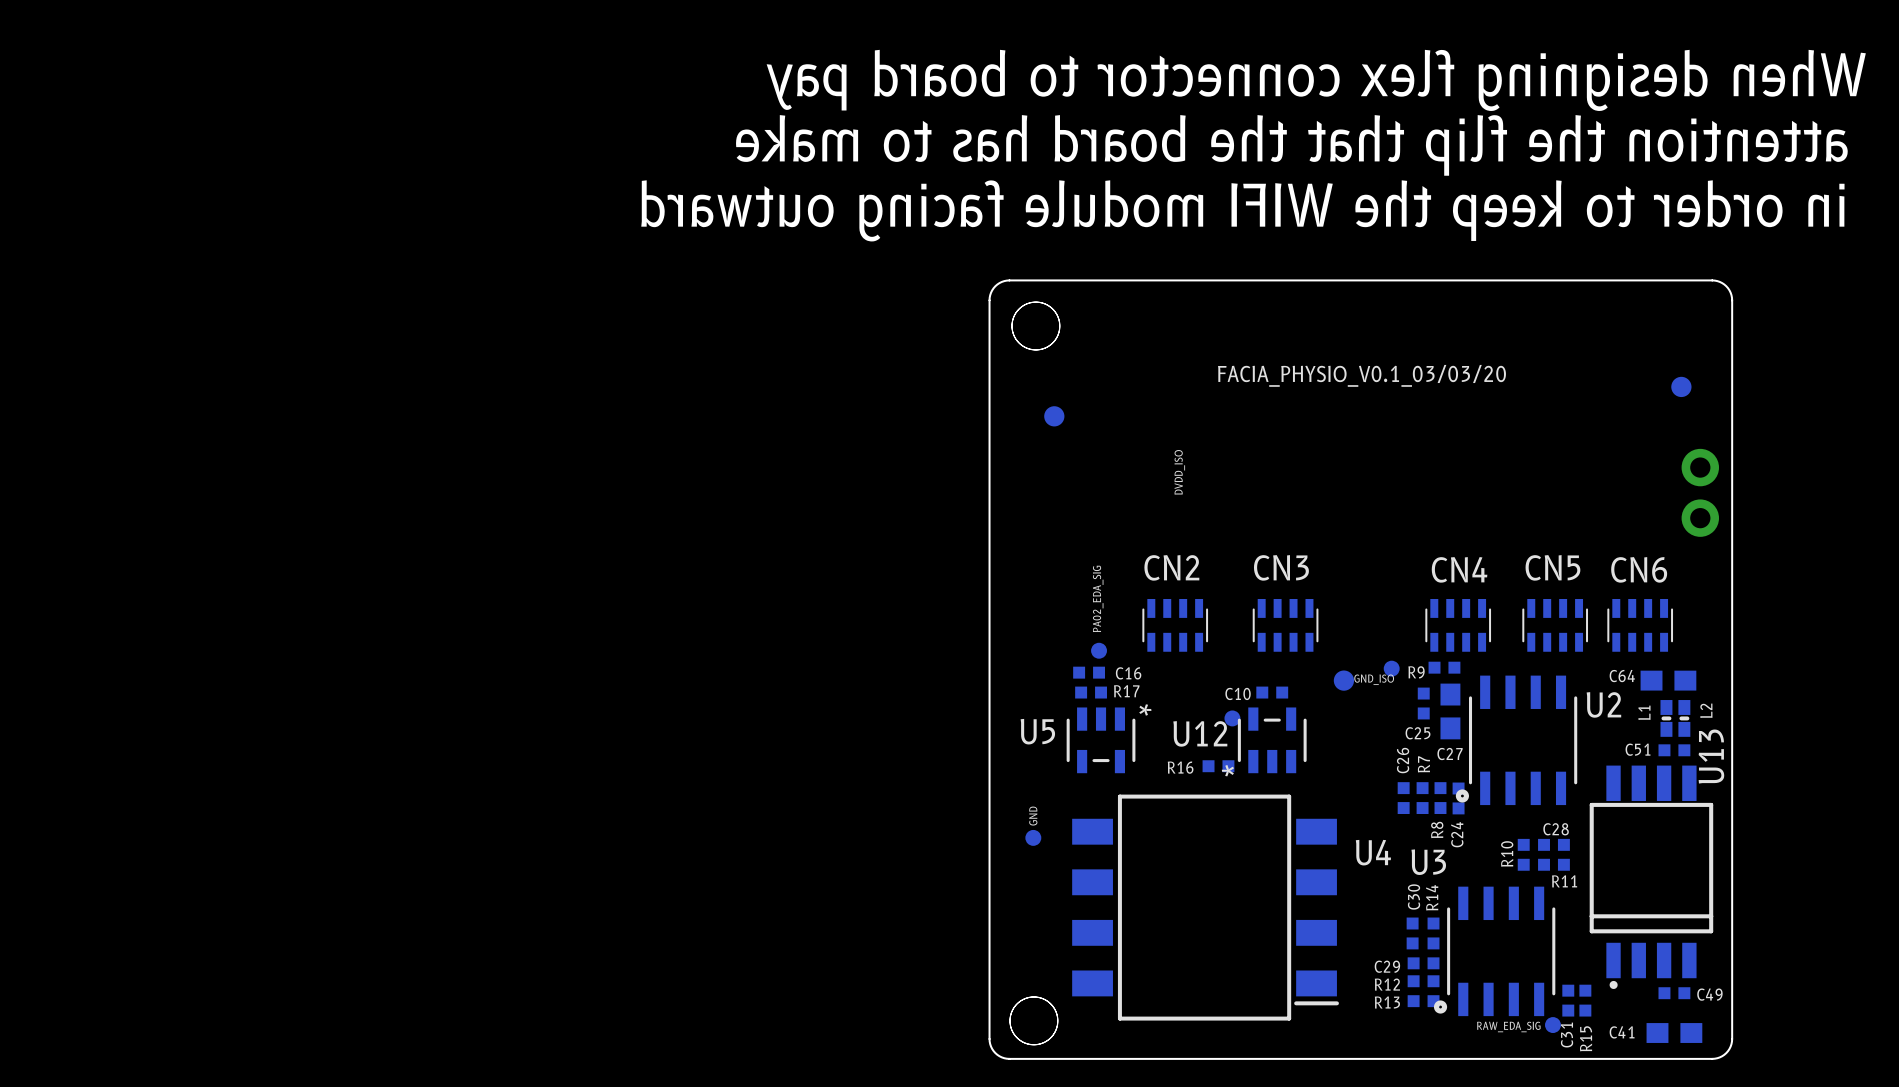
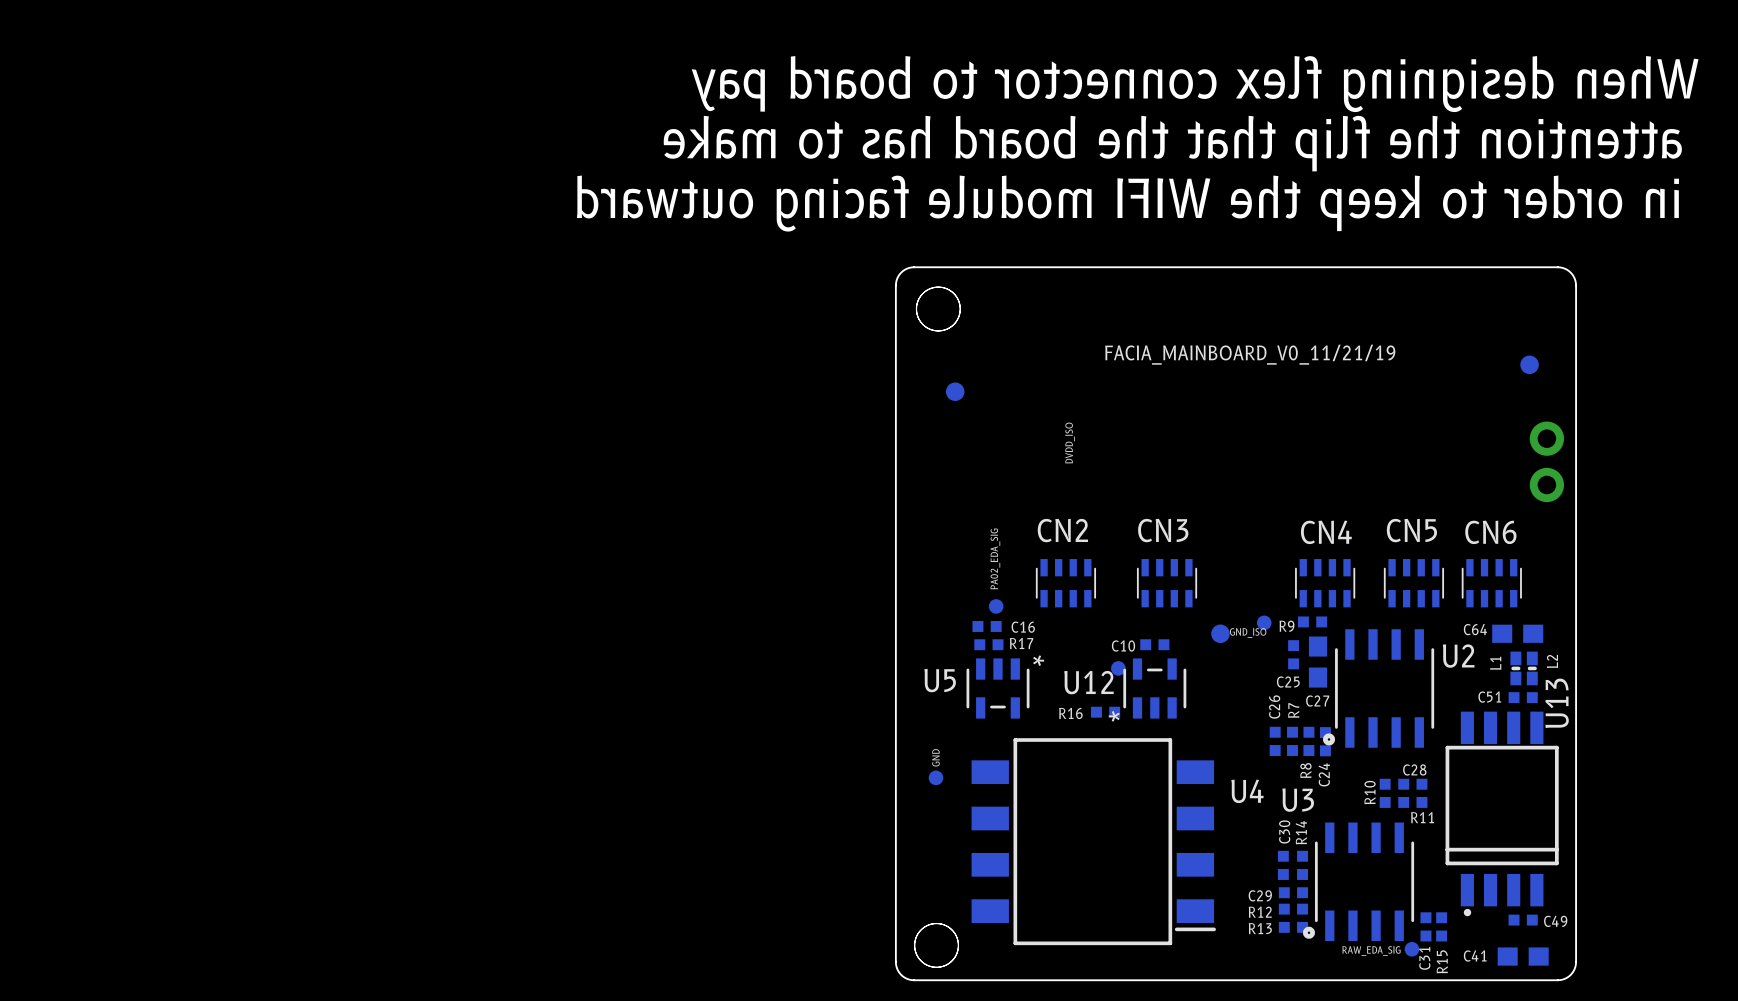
text: FACIA_PHYSIO_V0.1_03/03/20 (1362, 375) -> FACIA_MAINBOARD_V0_11/21/19 (1250, 354)

